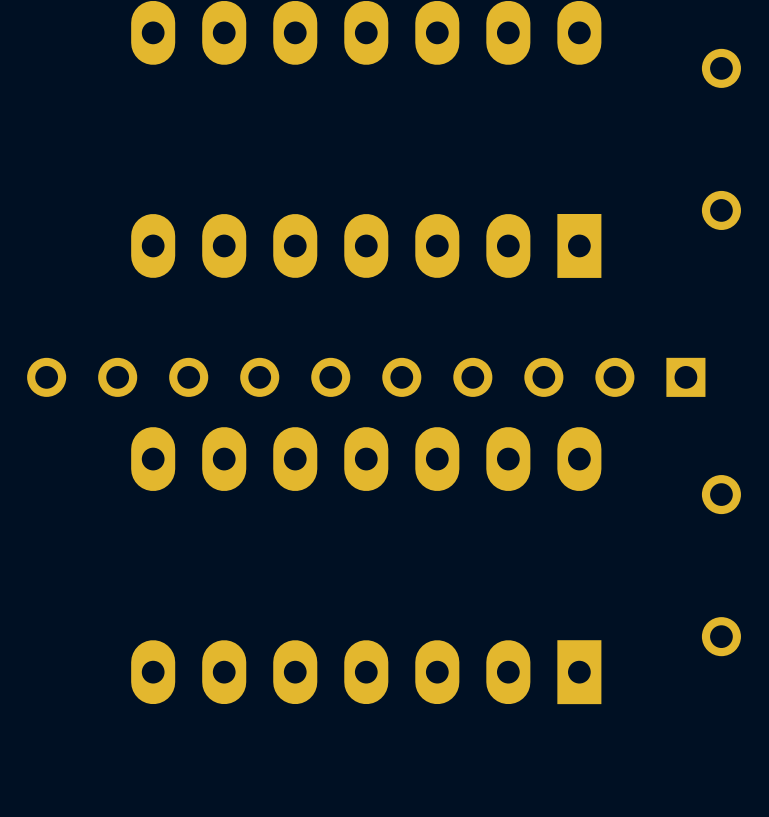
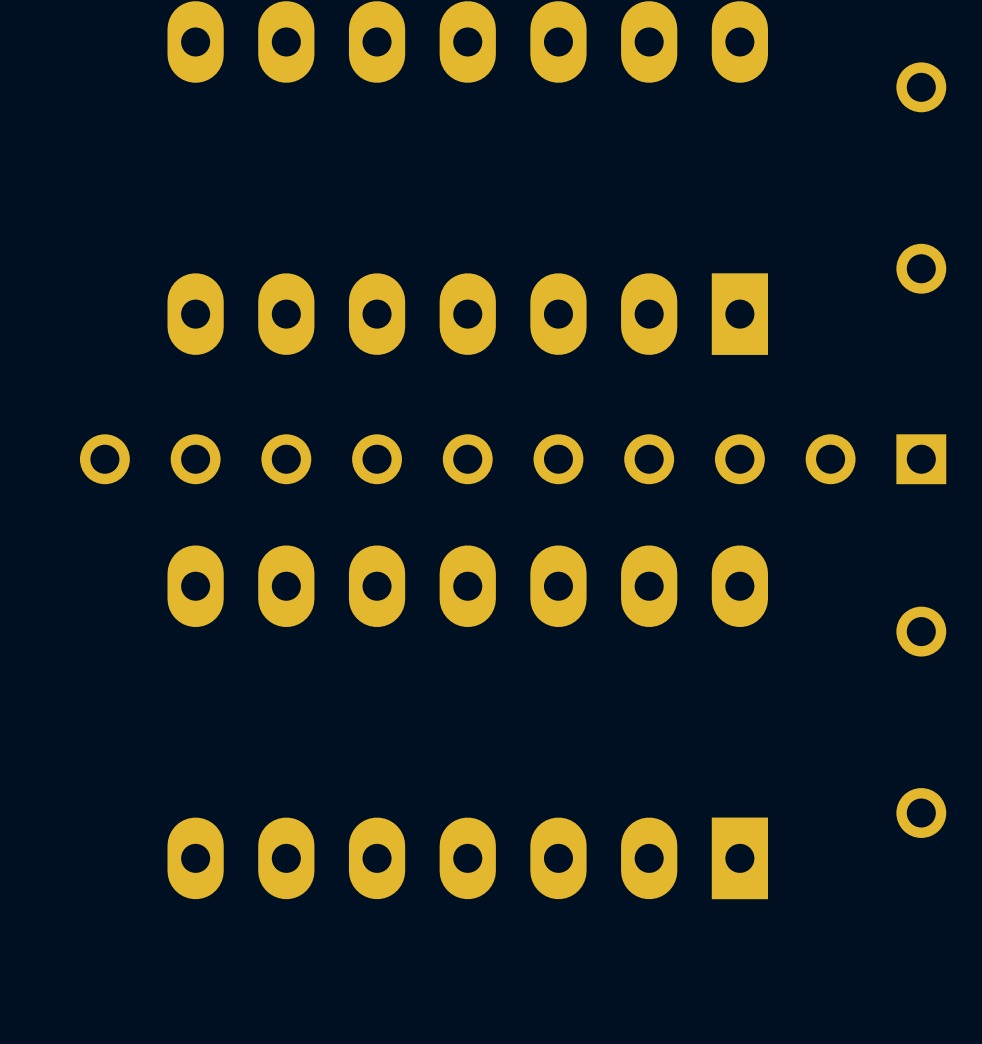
part position: (366, 377) -> (513, 459)

